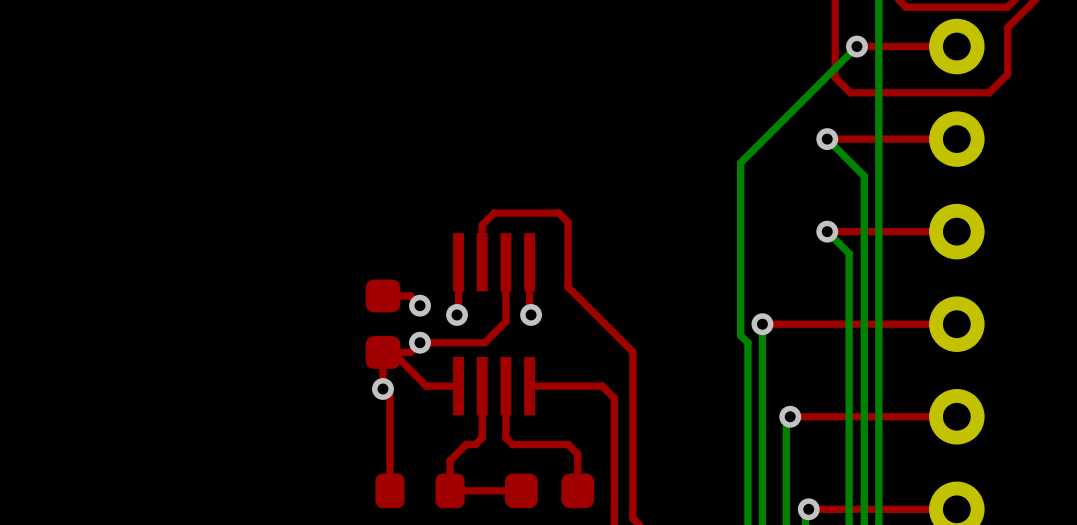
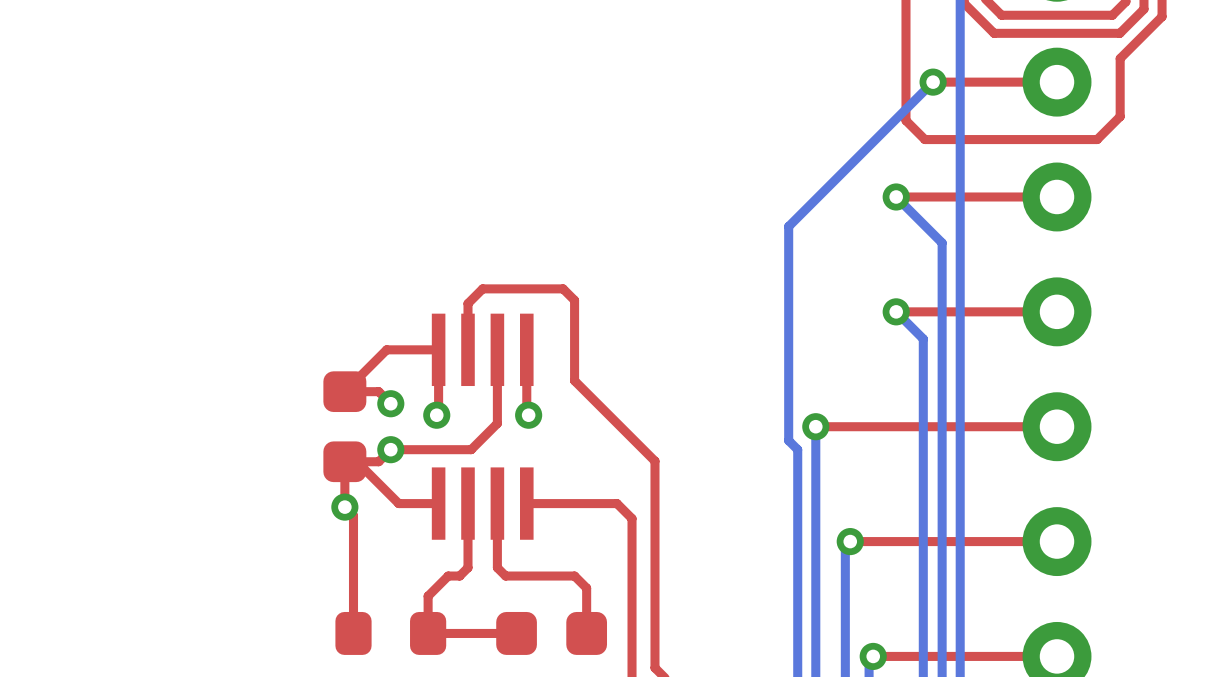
top track: none -> (438, 349) (386, 349) (344, 391)

